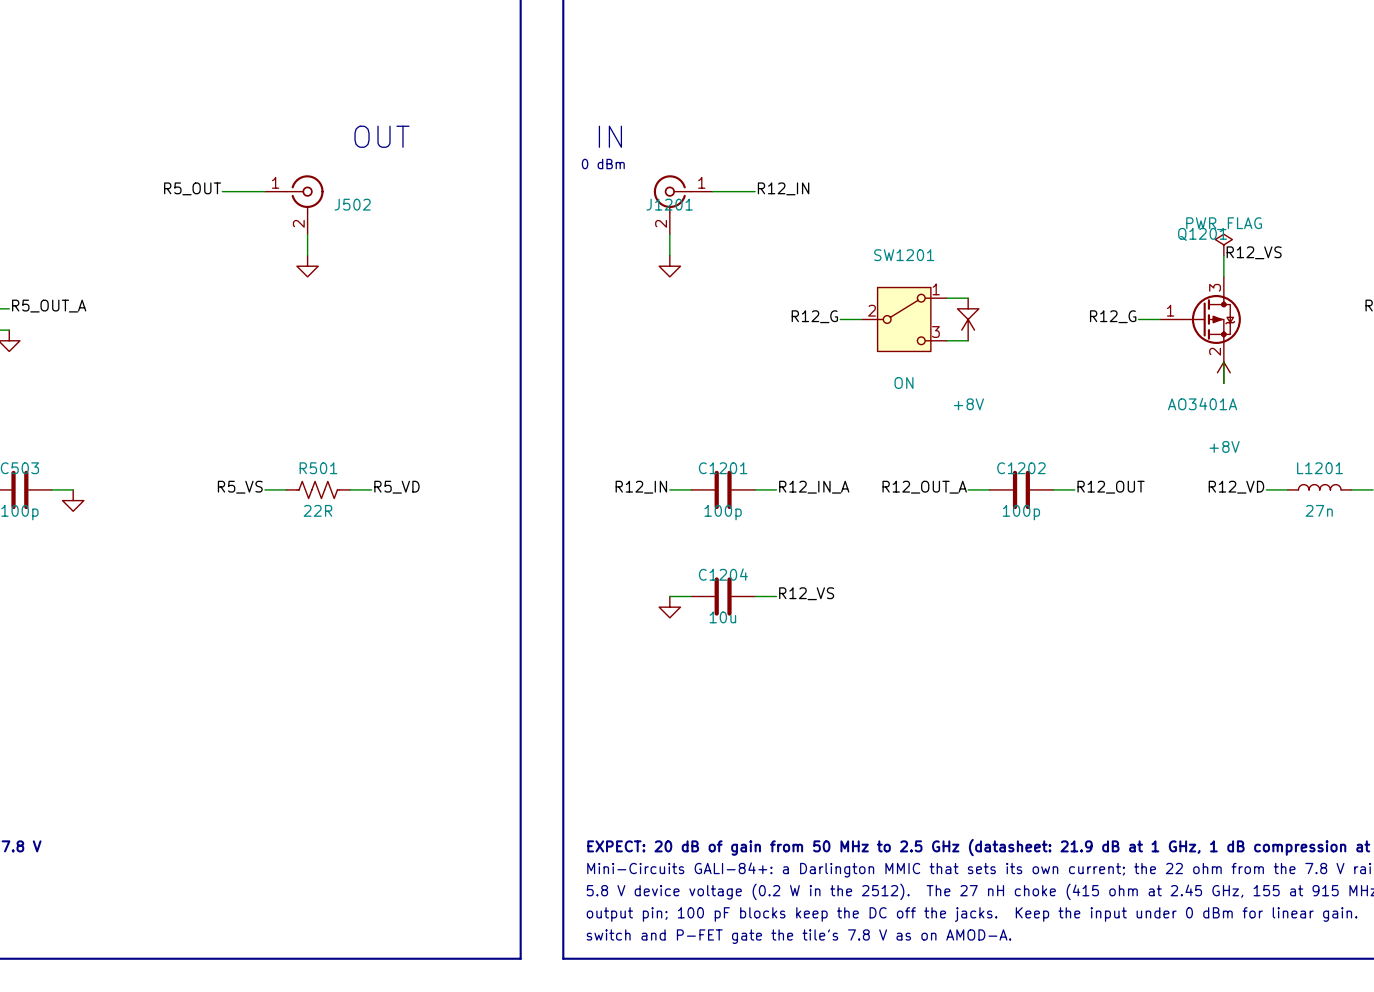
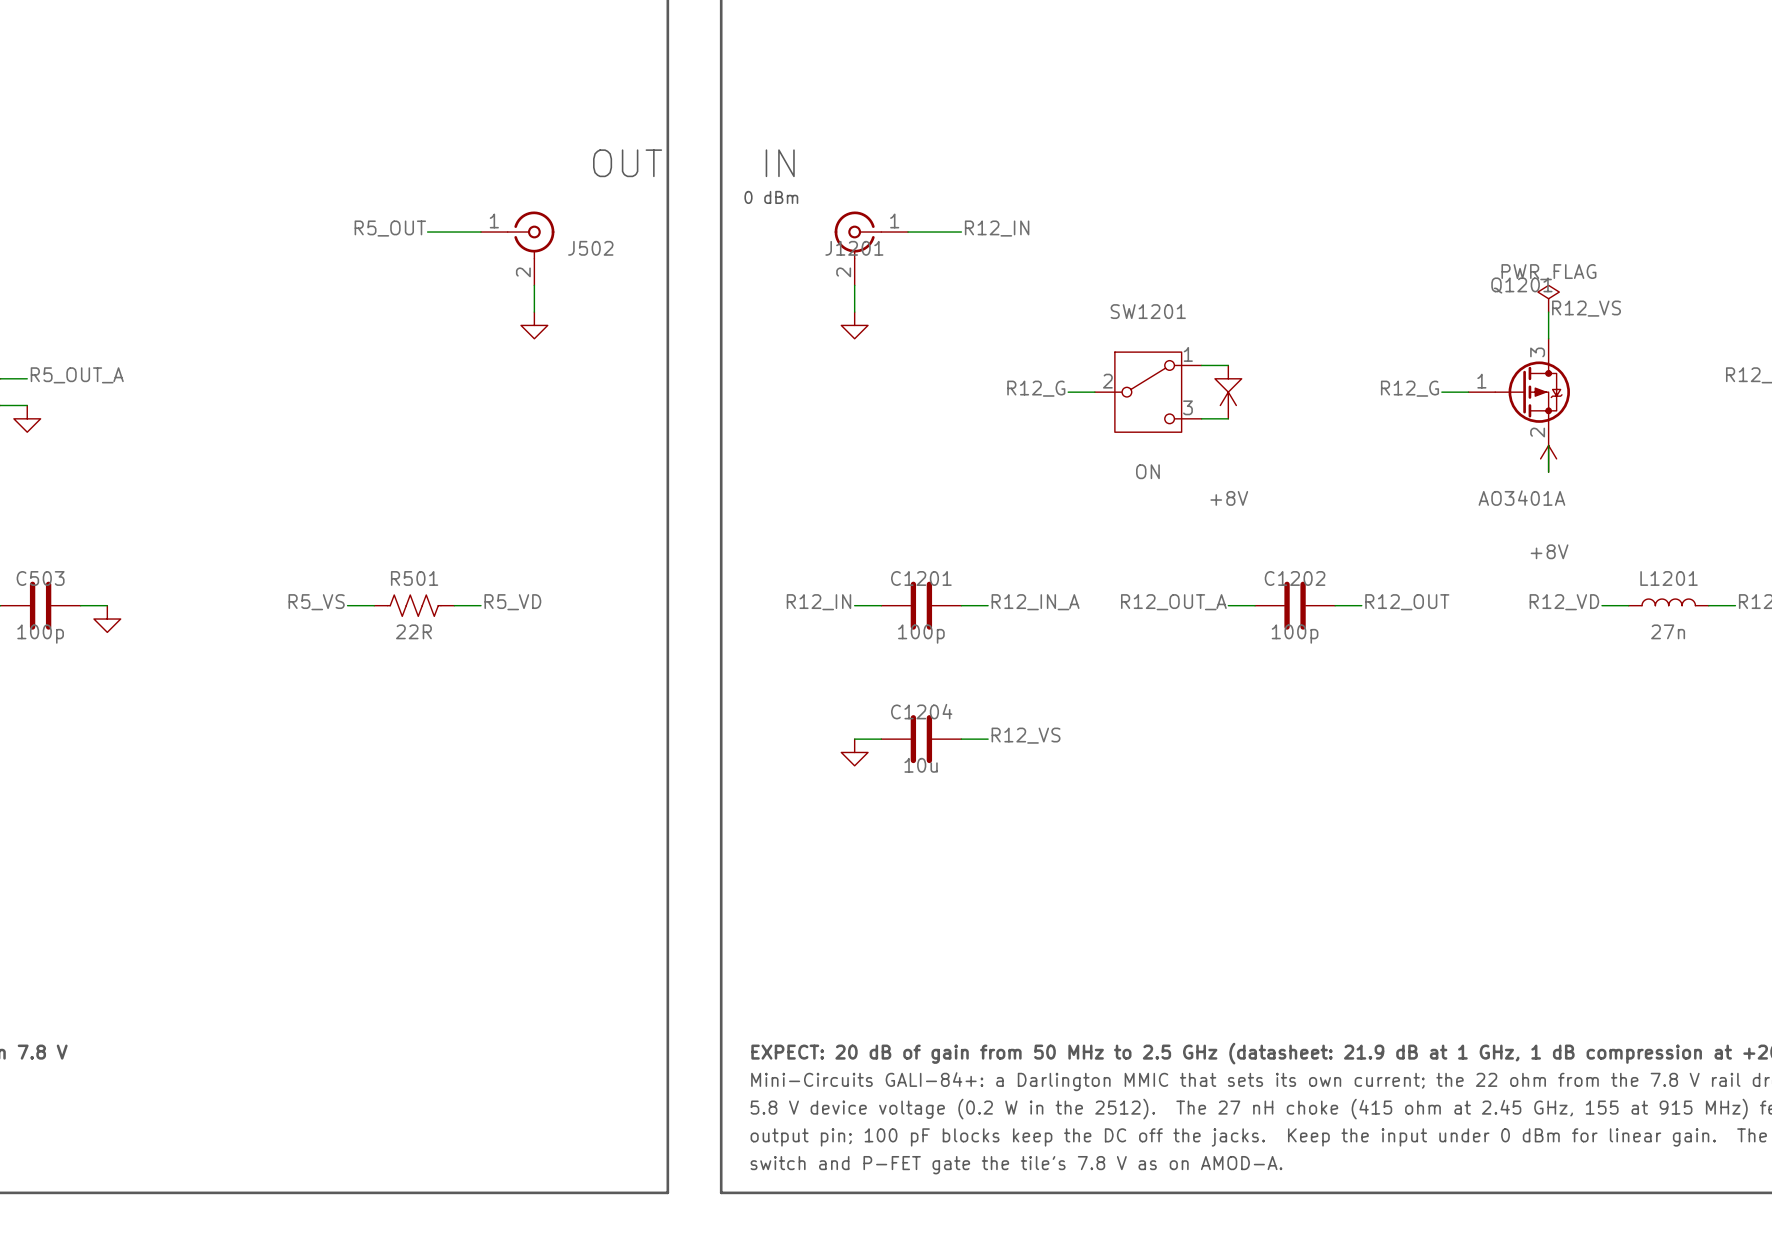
text position: OUT (382, 136) -> OUT (627, 163)
label position: R5_OUT (192, 188) -> R5_OUT (390, 228)
wire: (222, 191) (264, 191) -> (427, 232) (480, 232)
J502 position: (294, 204) -> (517, 248)
wire: (307, 234) (307, 255) -> (534, 285) (534, 312)
power symbol position: (307, 266) -> (534, 325)

